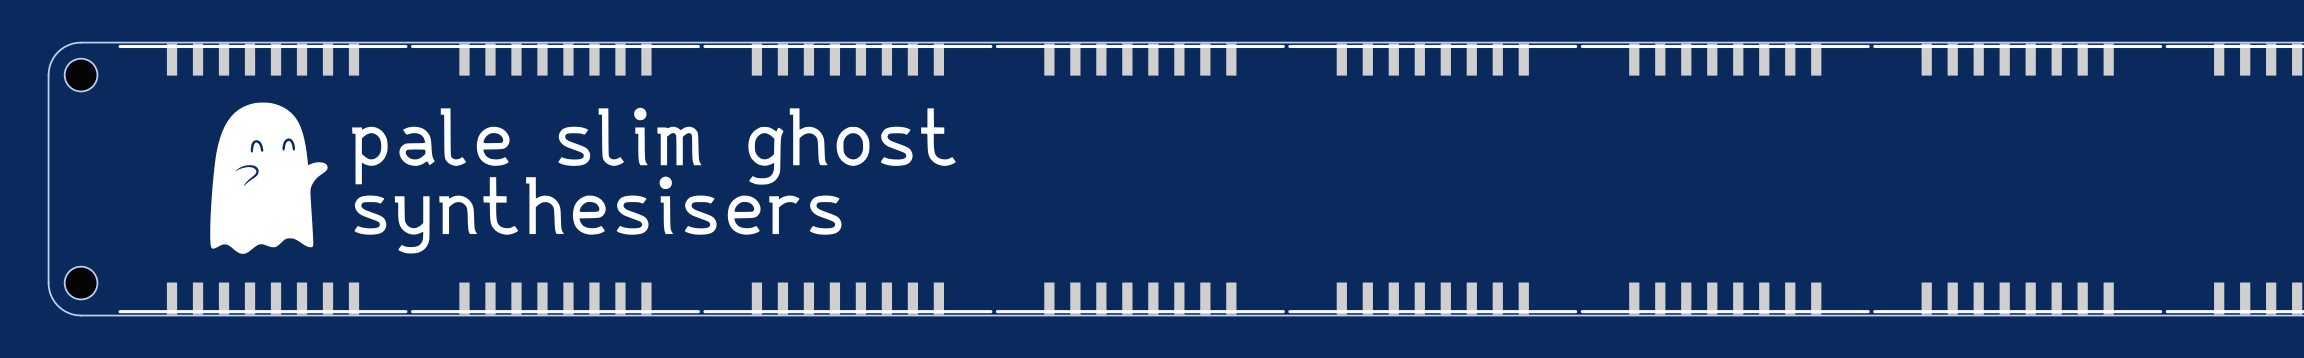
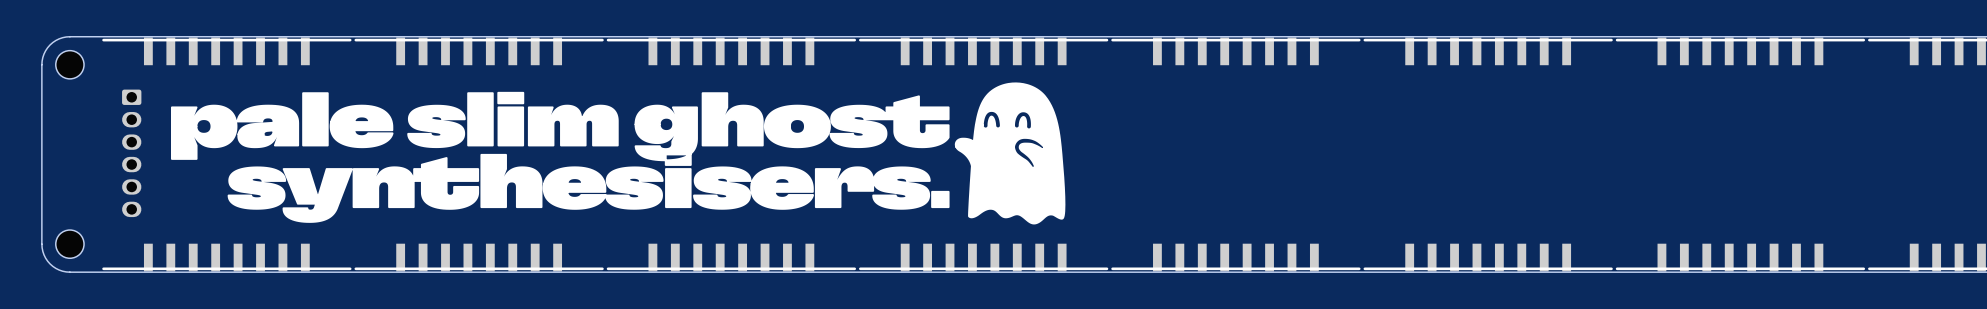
drawing: none -> [171, 82, 1066, 225]
drawing: [210, 102, 956, 254] -> none
part: none -> (131, 153)

